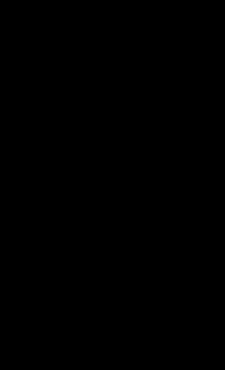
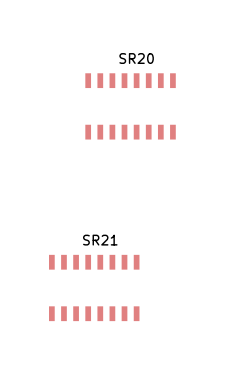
SR20: none -> (130, 106)
SR21: none -> (94, 287)

